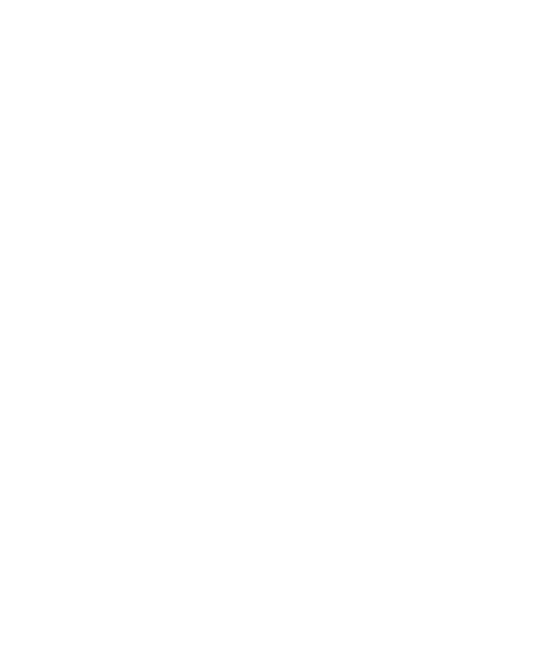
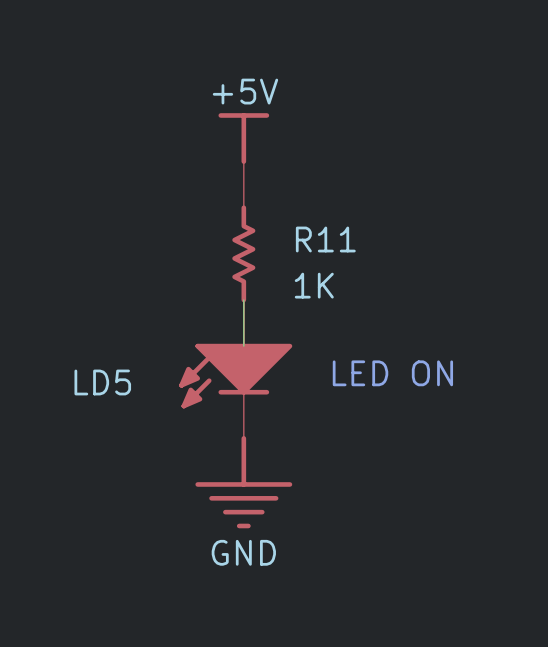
power symbol: none -> +5V (243, 138)
R11: none -> (243, 253)
wire: none -> (243, 299) (243, 346)
LD5: none -> (235, 369)
text: none -> LED ON (392, 373)
power symbol: none -> GND (243, 482)

